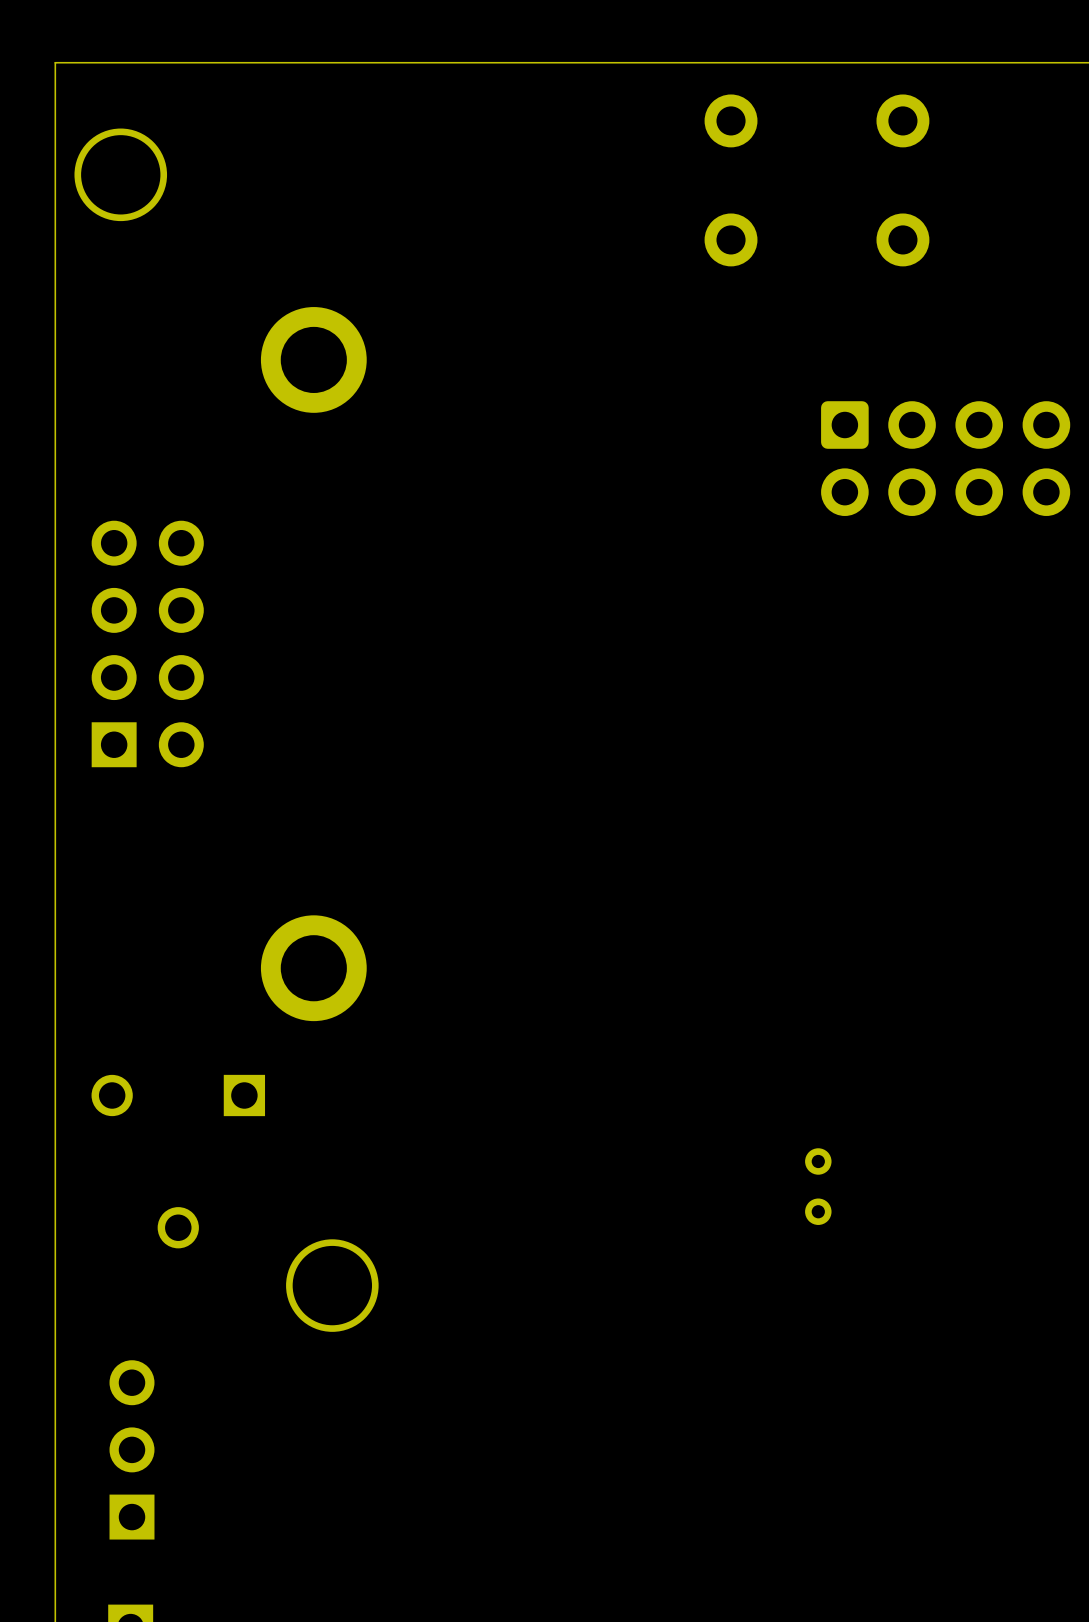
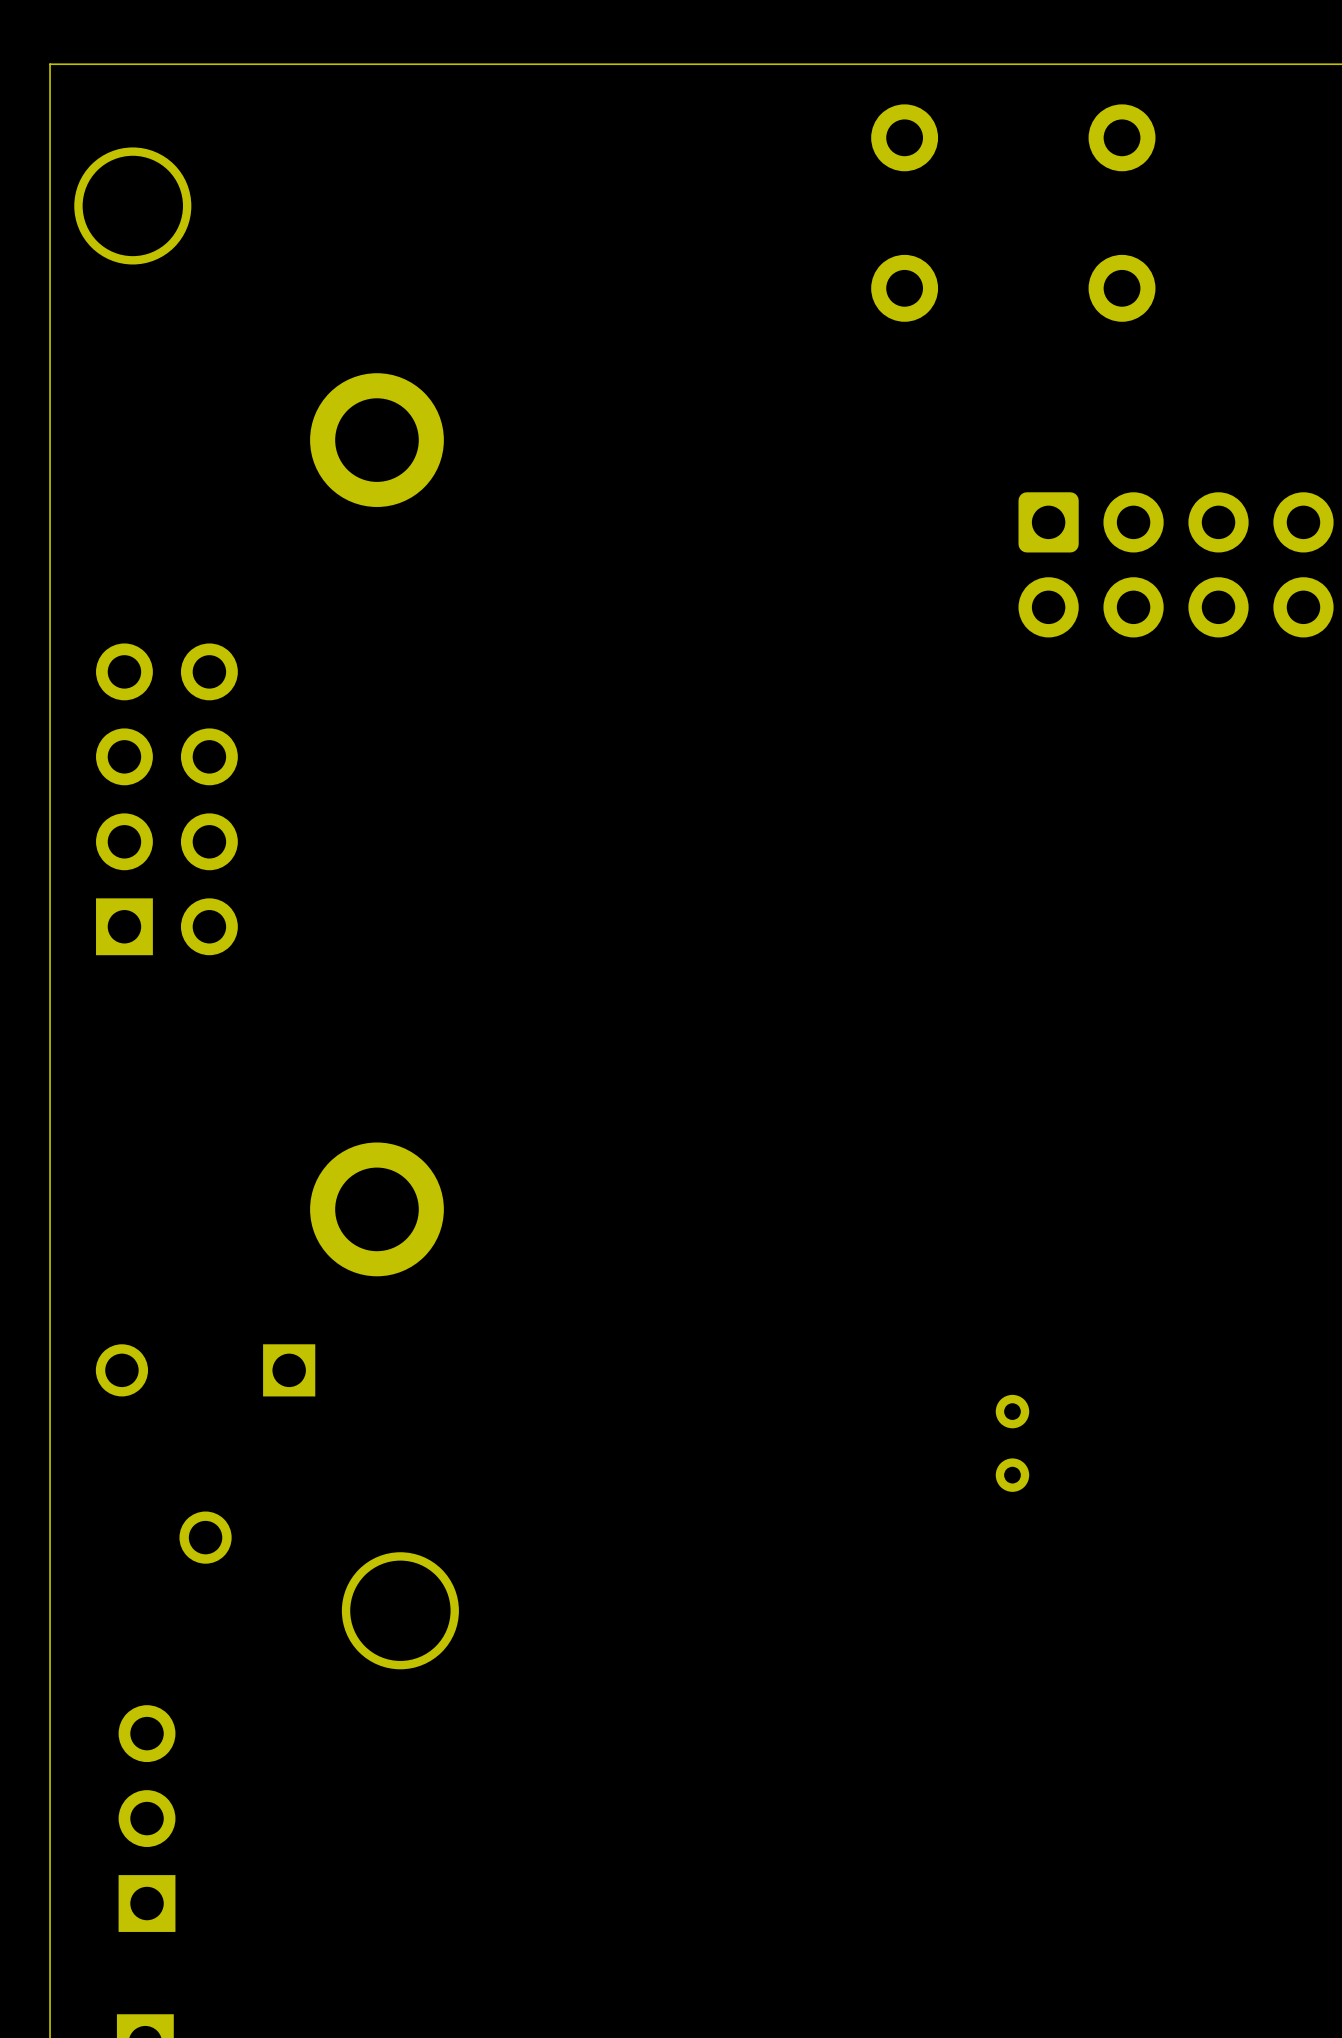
part position: (818, 1186) -> (1012, 1443)

